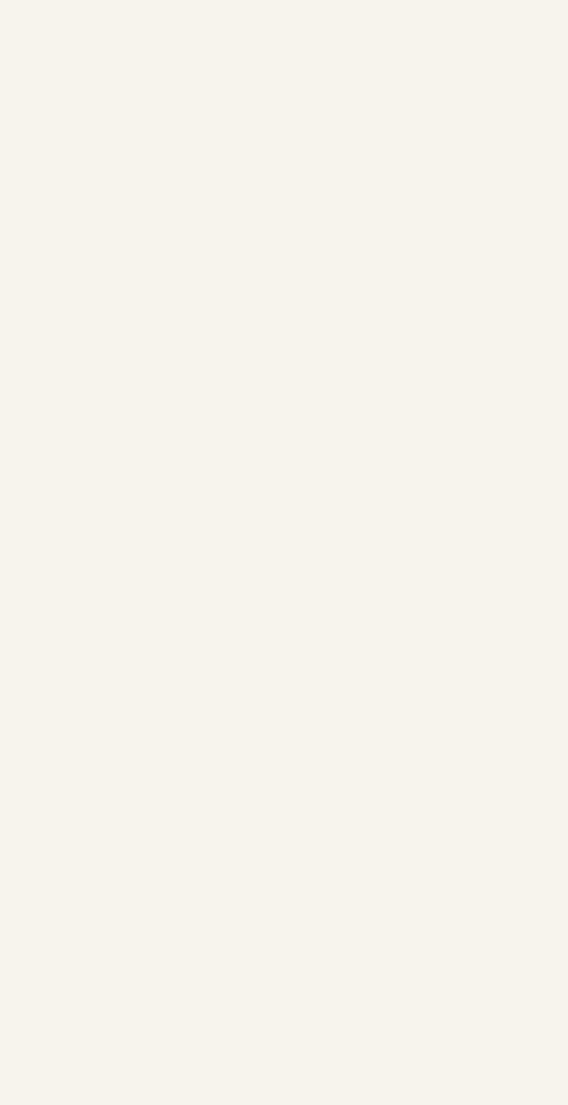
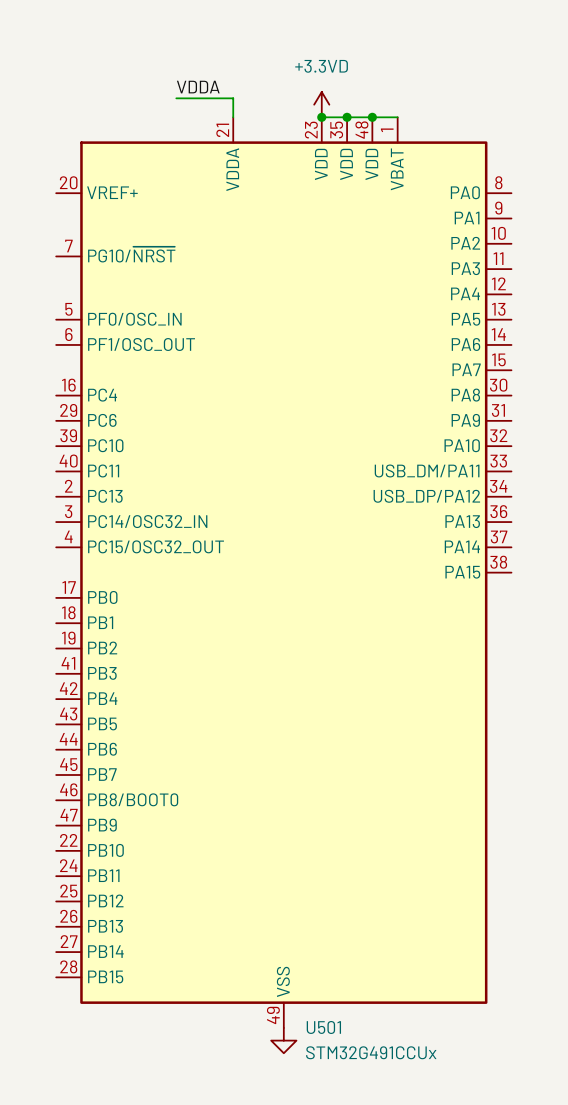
label: none -> VDDA (198, 87)
wire: none -> (176, 98) (233, 98) (233, 117)
power symbol: none -> +3.3VD (321, 104)
wire: none -> (321, 117) (397, 117)
junction: none -> (321, 117)
junction: none -> (347, 117)
junction: none -> (372, 117)
U501: none -> STM32G491CCUx (283, 572)
power symbol: none -> (283, 1040)

